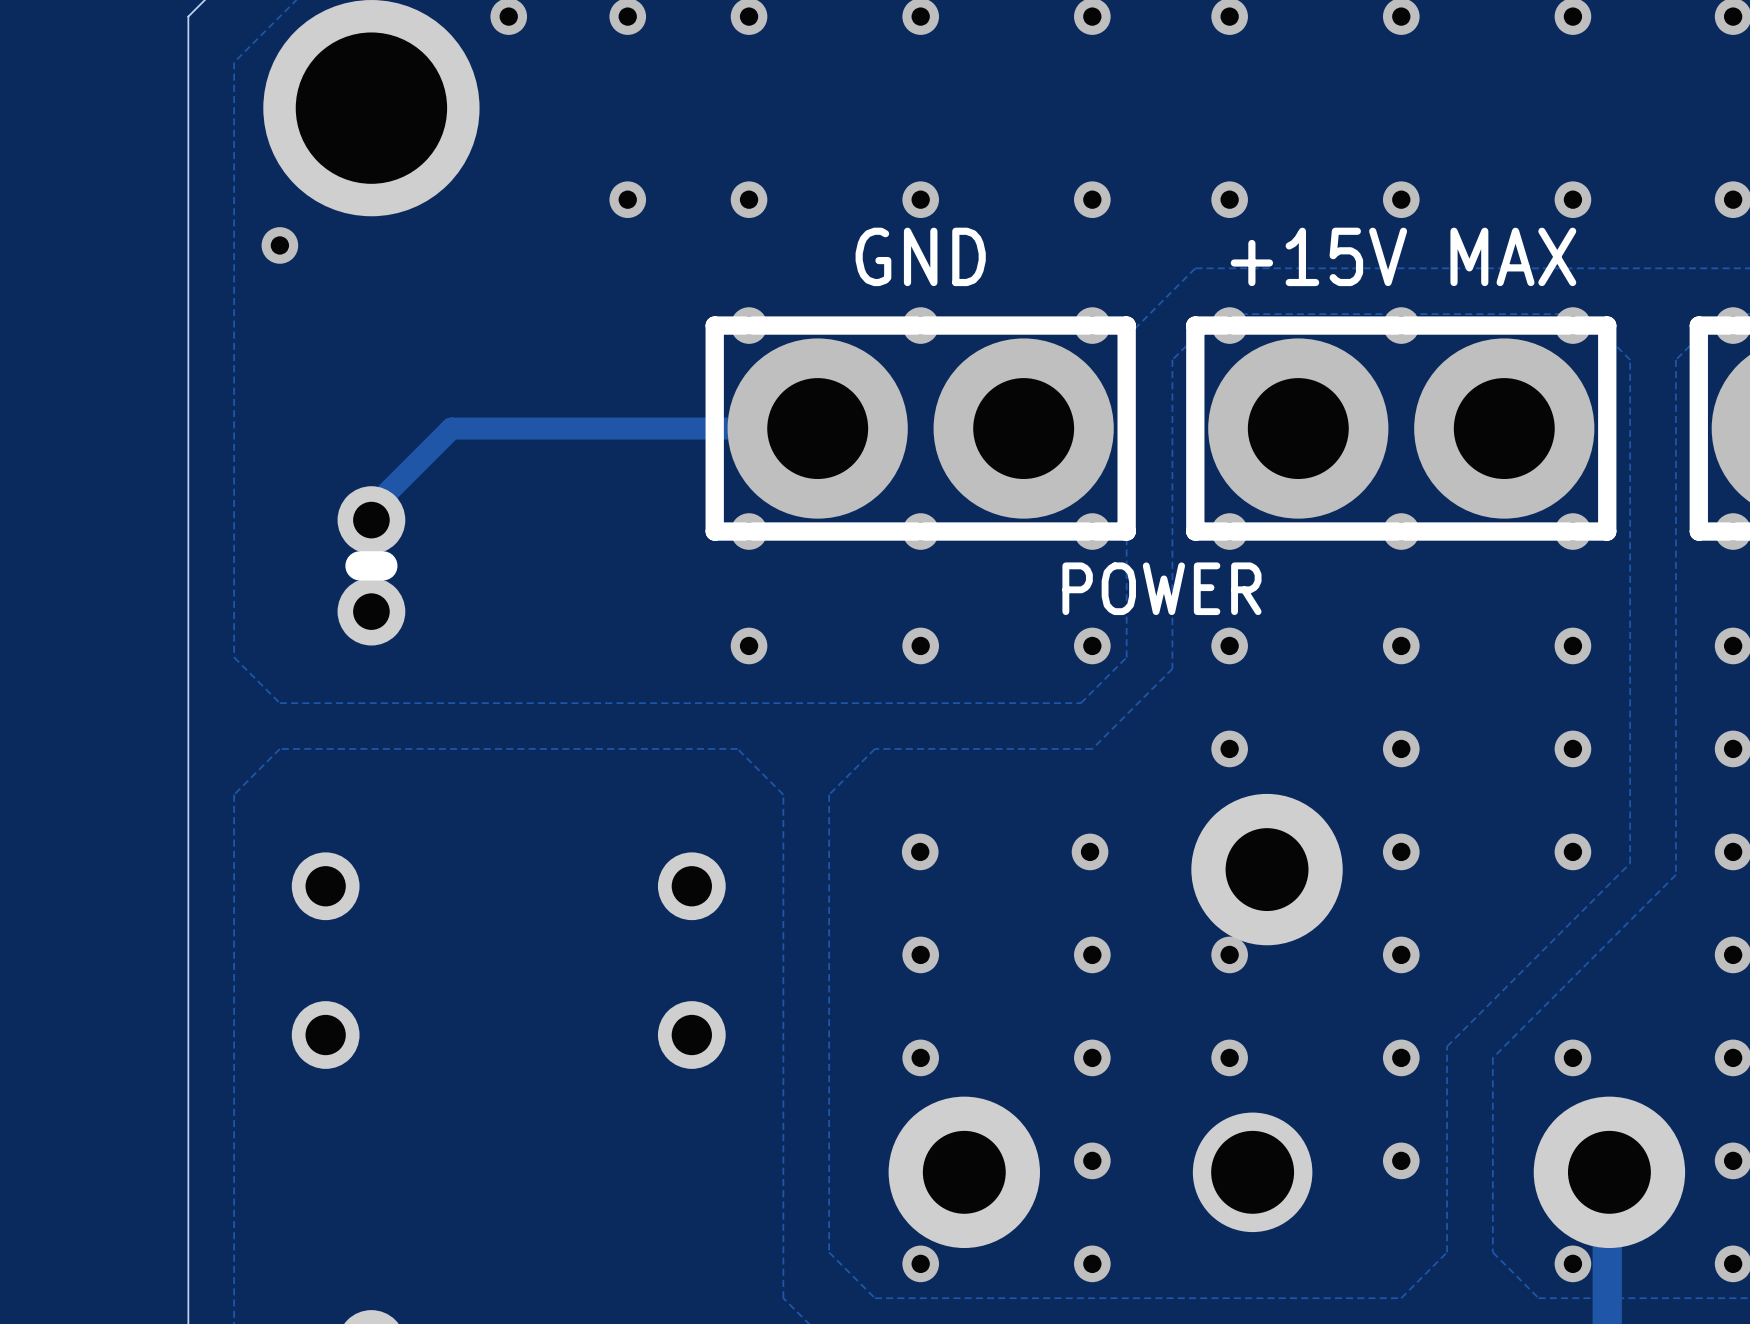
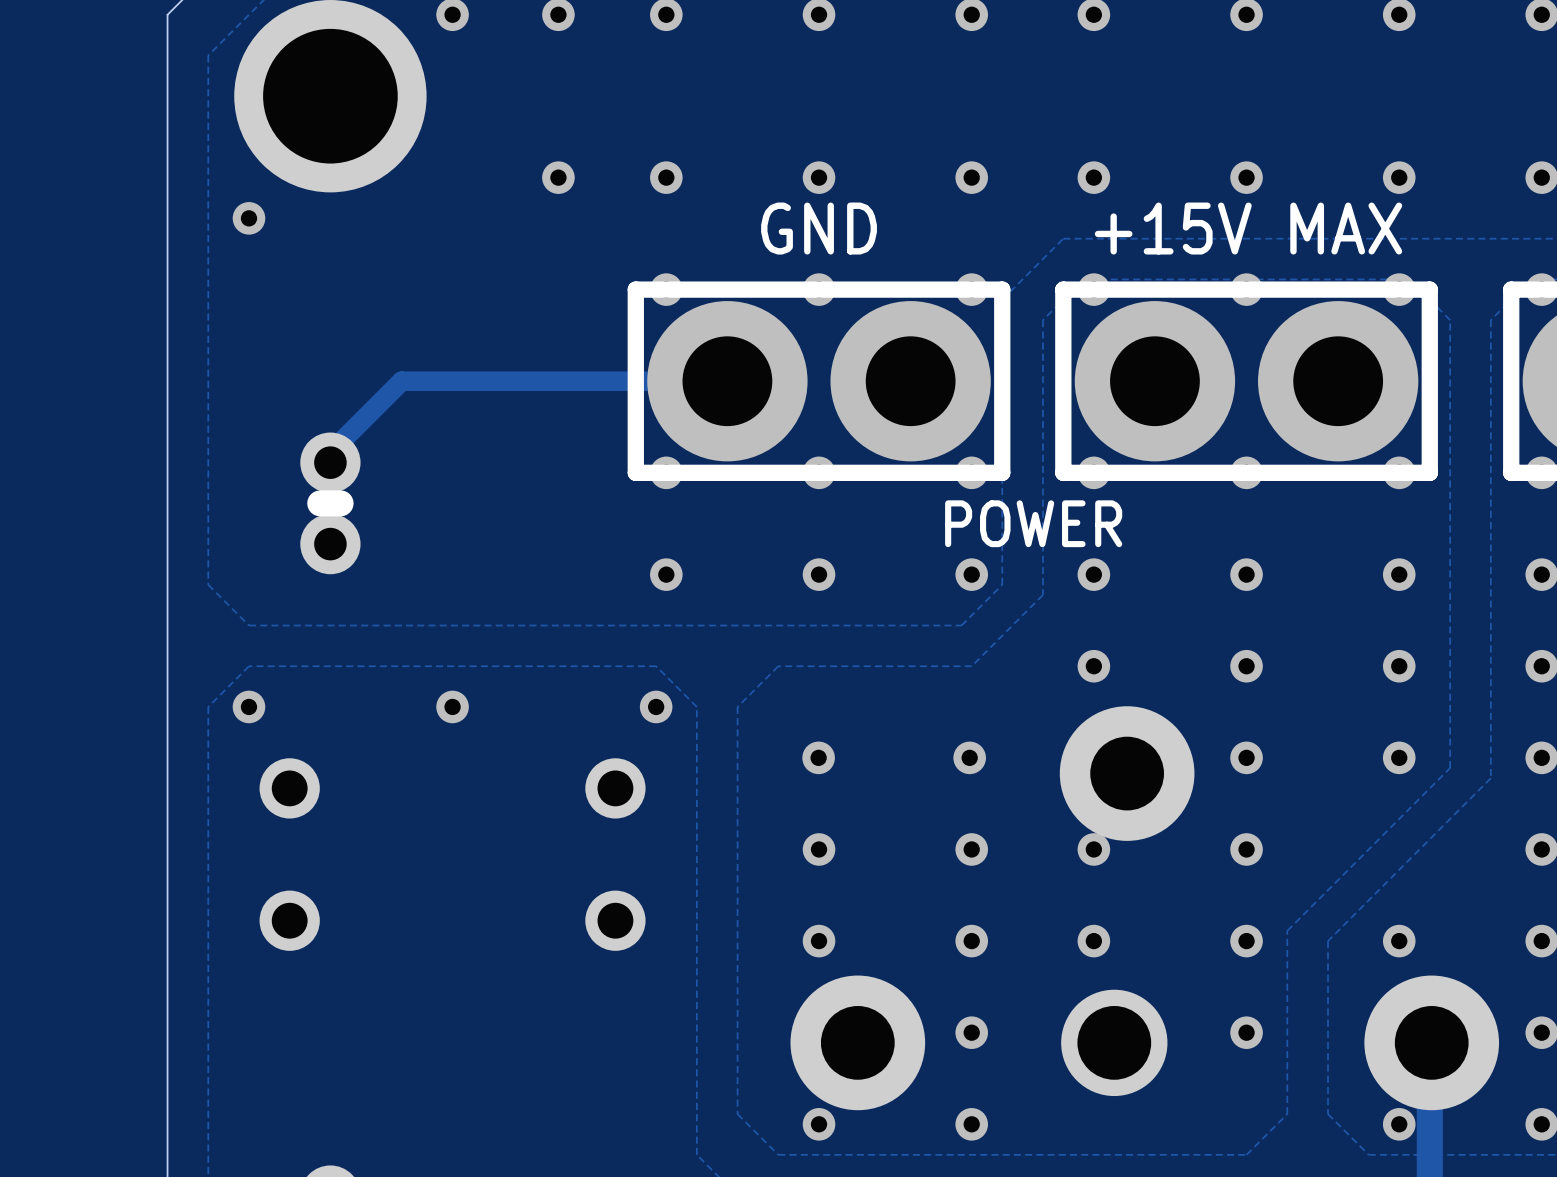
via: none -> (248, 706)
via: none -> (452, 706)
via: none -> (656, 706)

